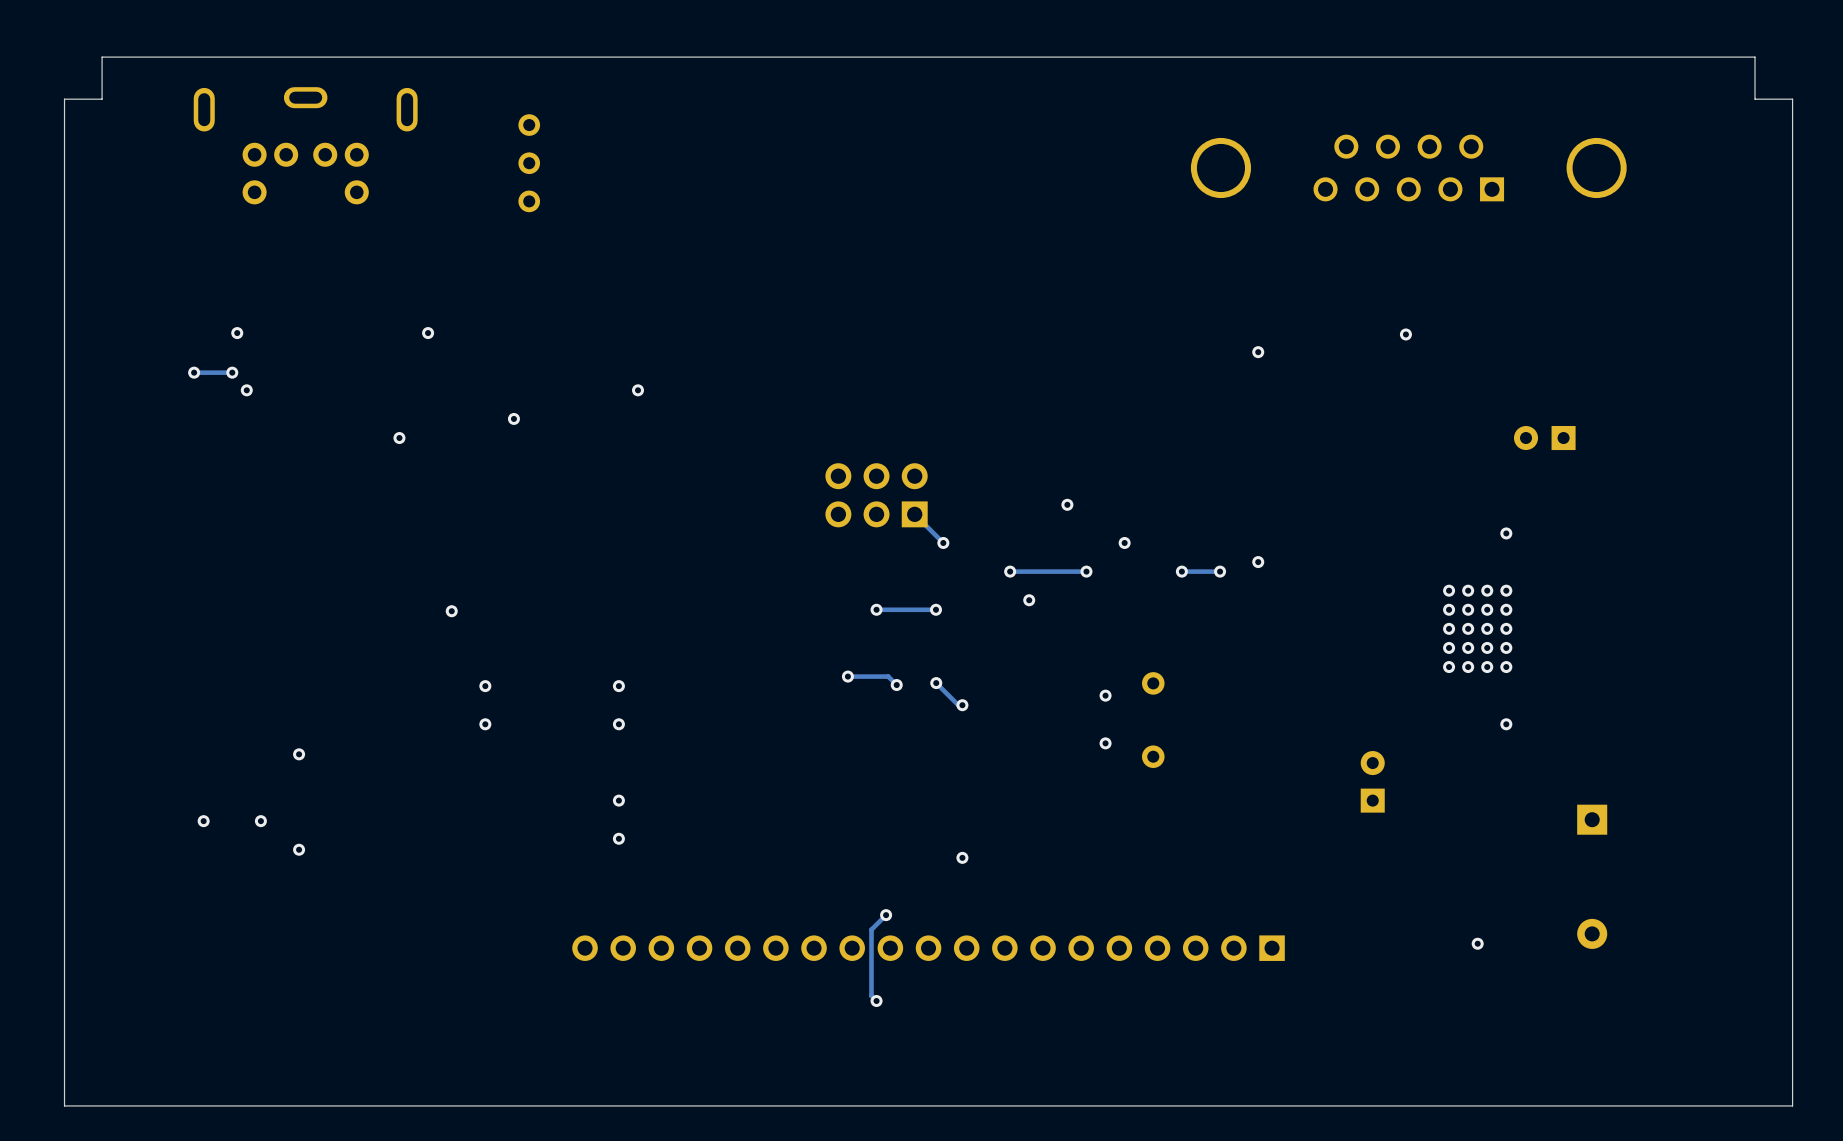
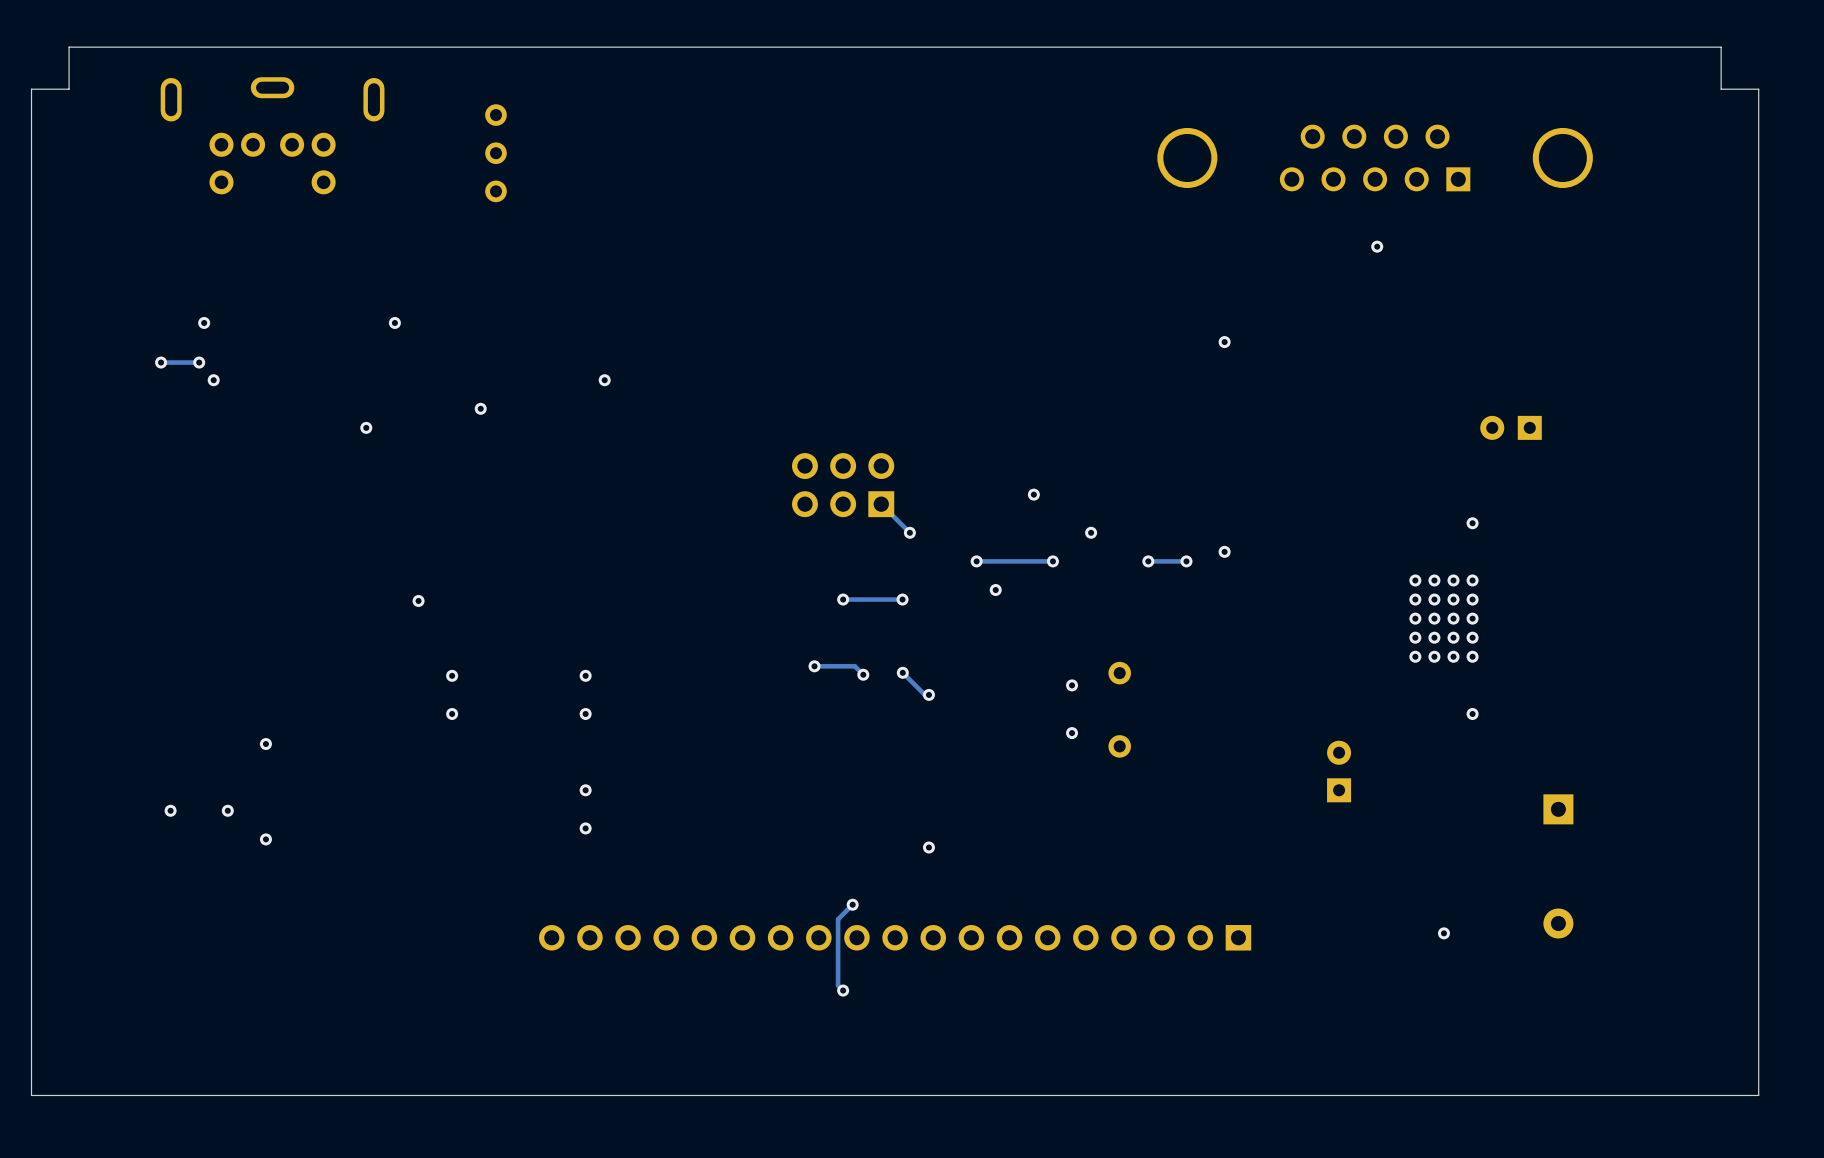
via position: (1405, 334) -> (1377, 246)

